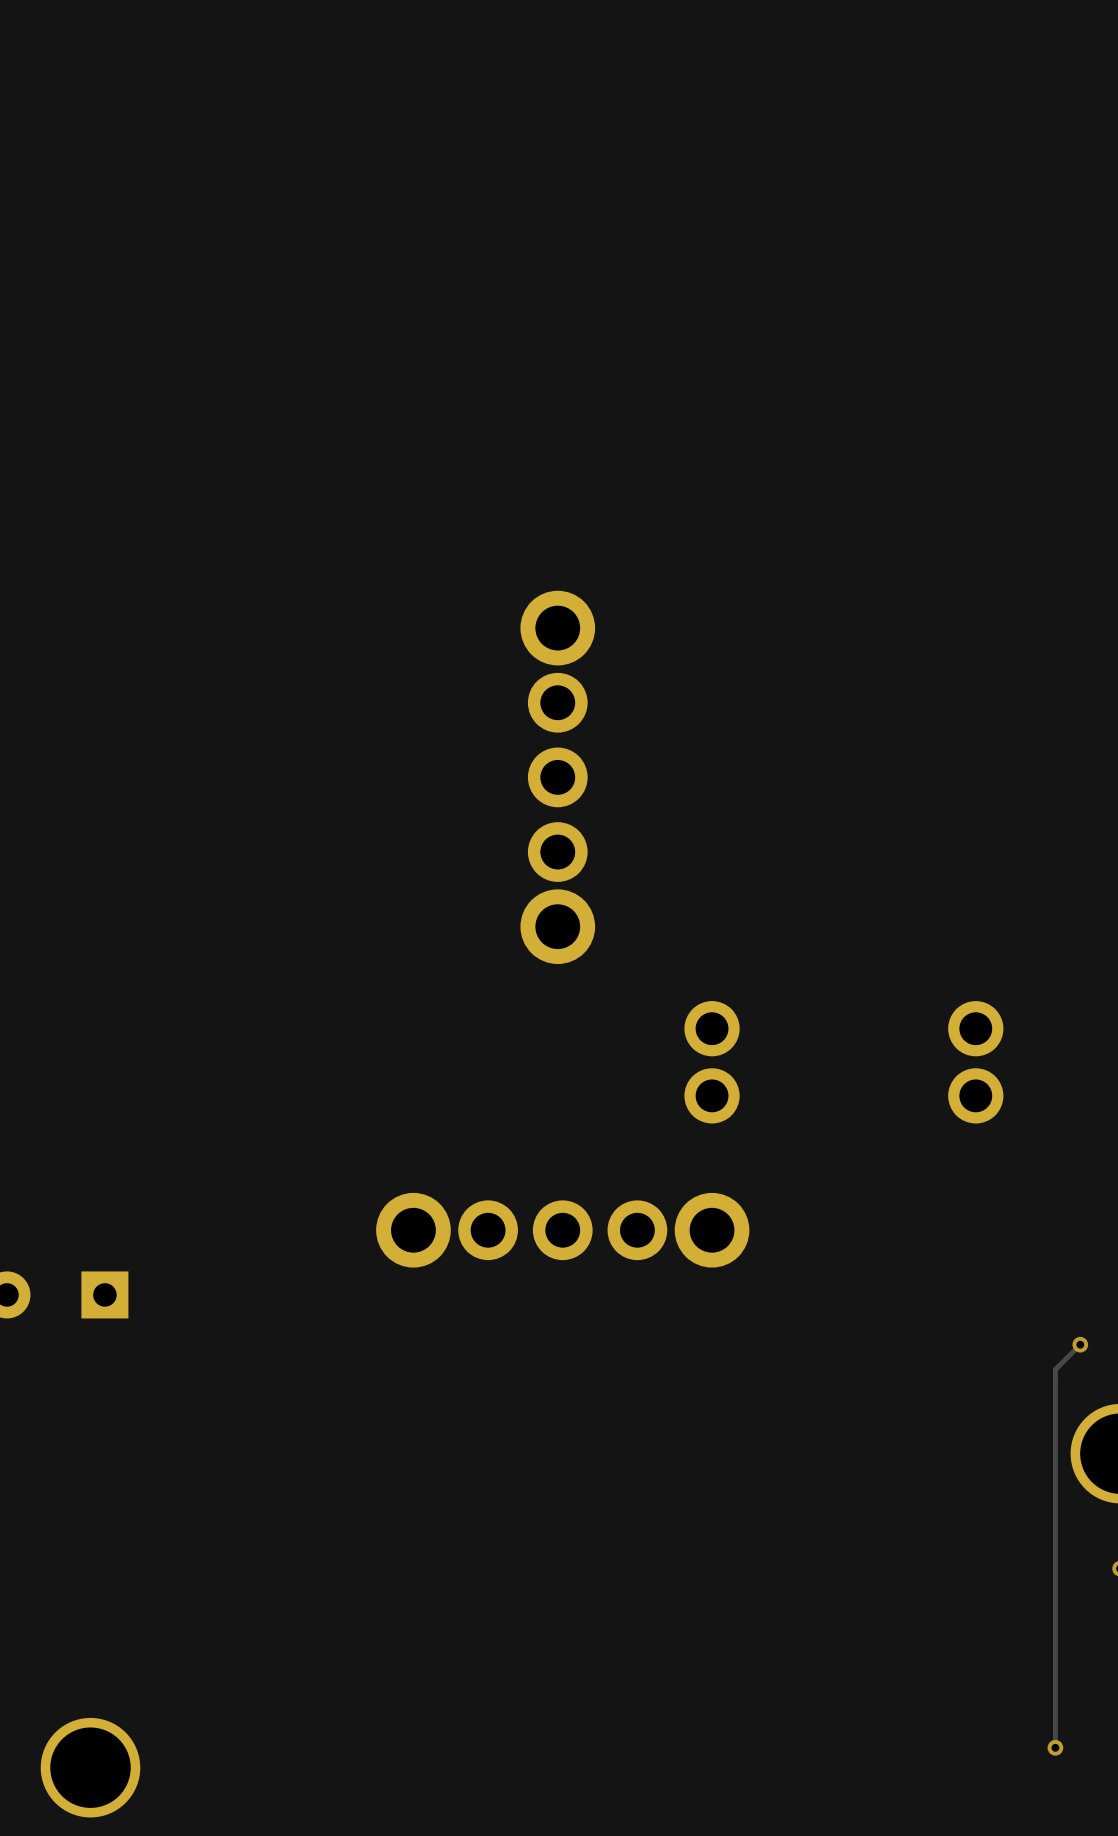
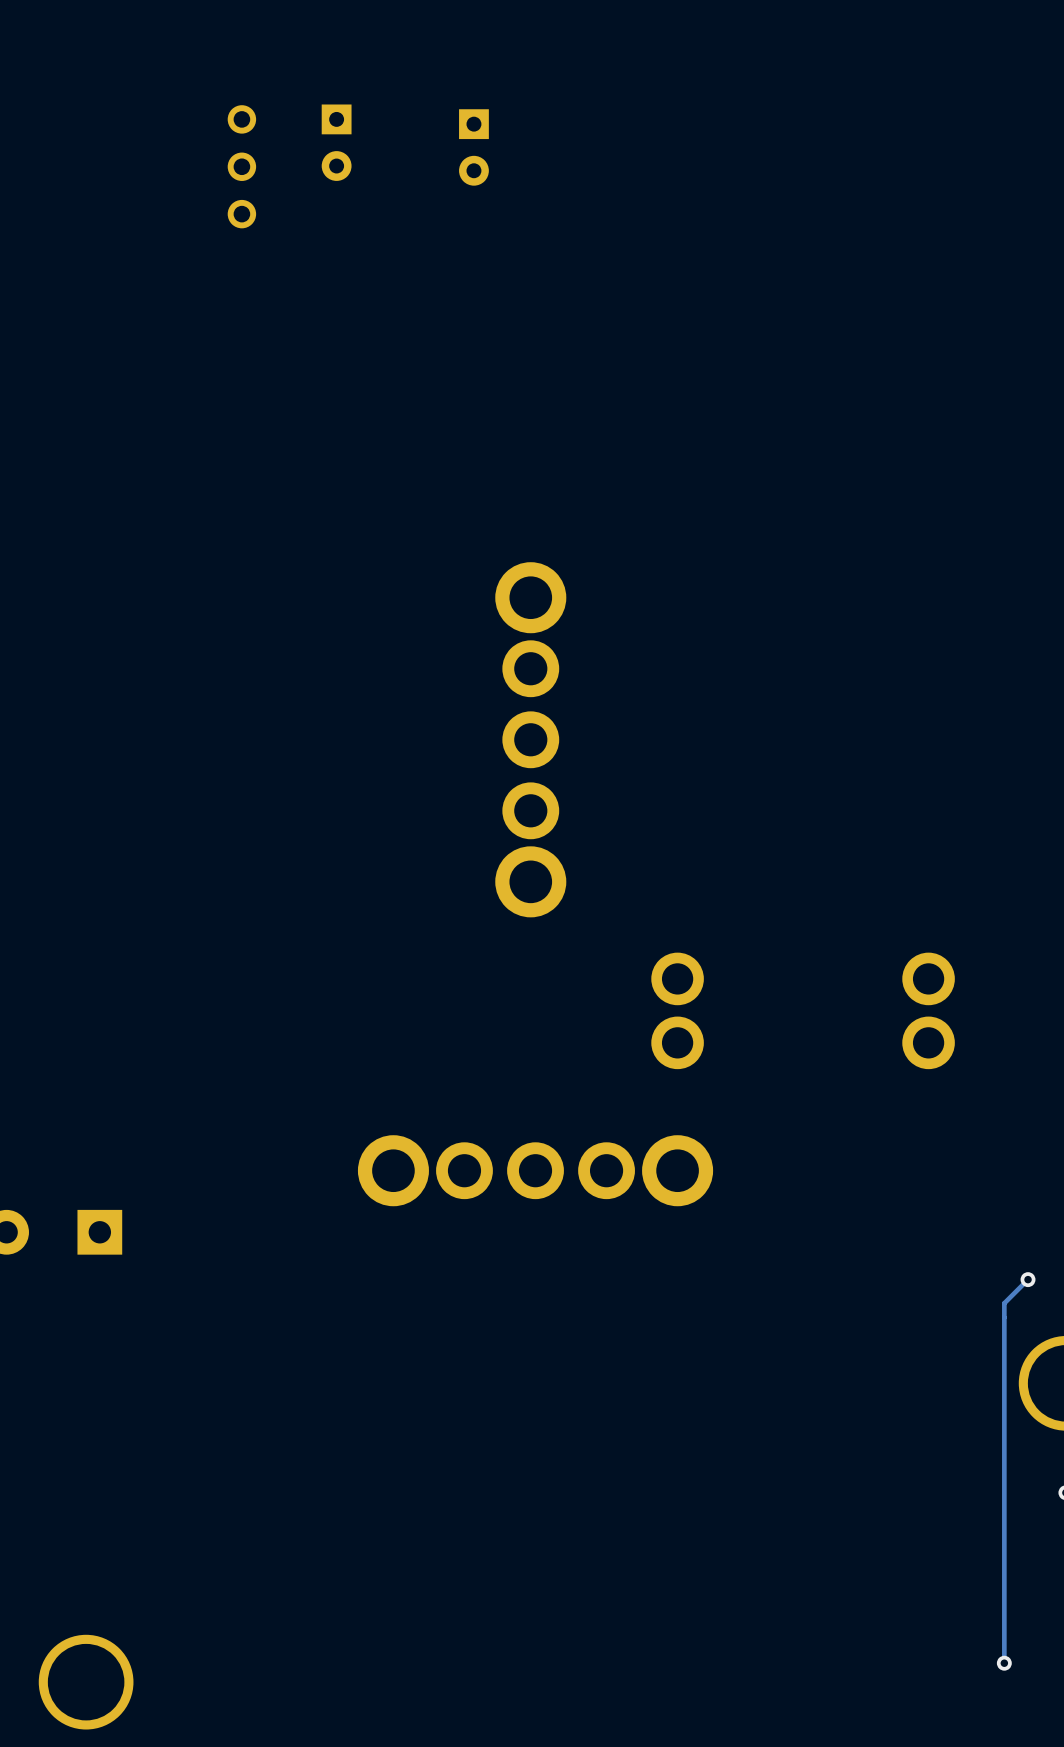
part: none -> (336, 142)
part: none -> (473, 147)
part: none -> (241, 166)

